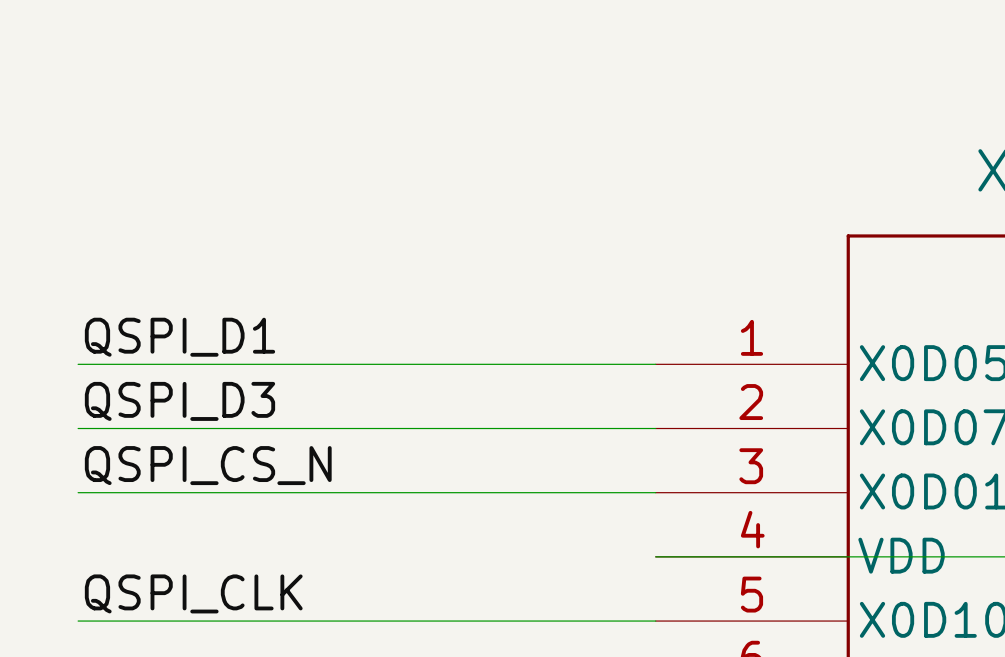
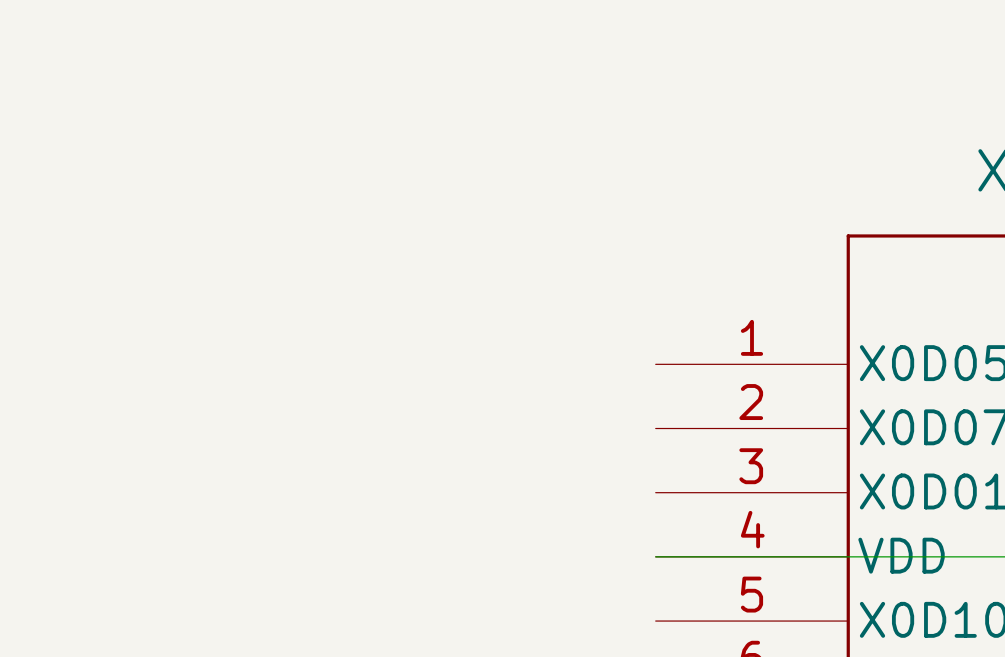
label: QSPI_D1 (179, 337) -> none
wire: (78, 364) (655, 364) -> none
label: QSPI_D3 (179, 401) -> none
wire: (78, 428) (655, 428) -> none
label: QSPI_CS_N (208, 465) -> none
wire: (78, 492) (655, 492) -> none
label: QSPI_CLK (193, 593) -> none
wire: (78, 621) (655, 621) -> none

